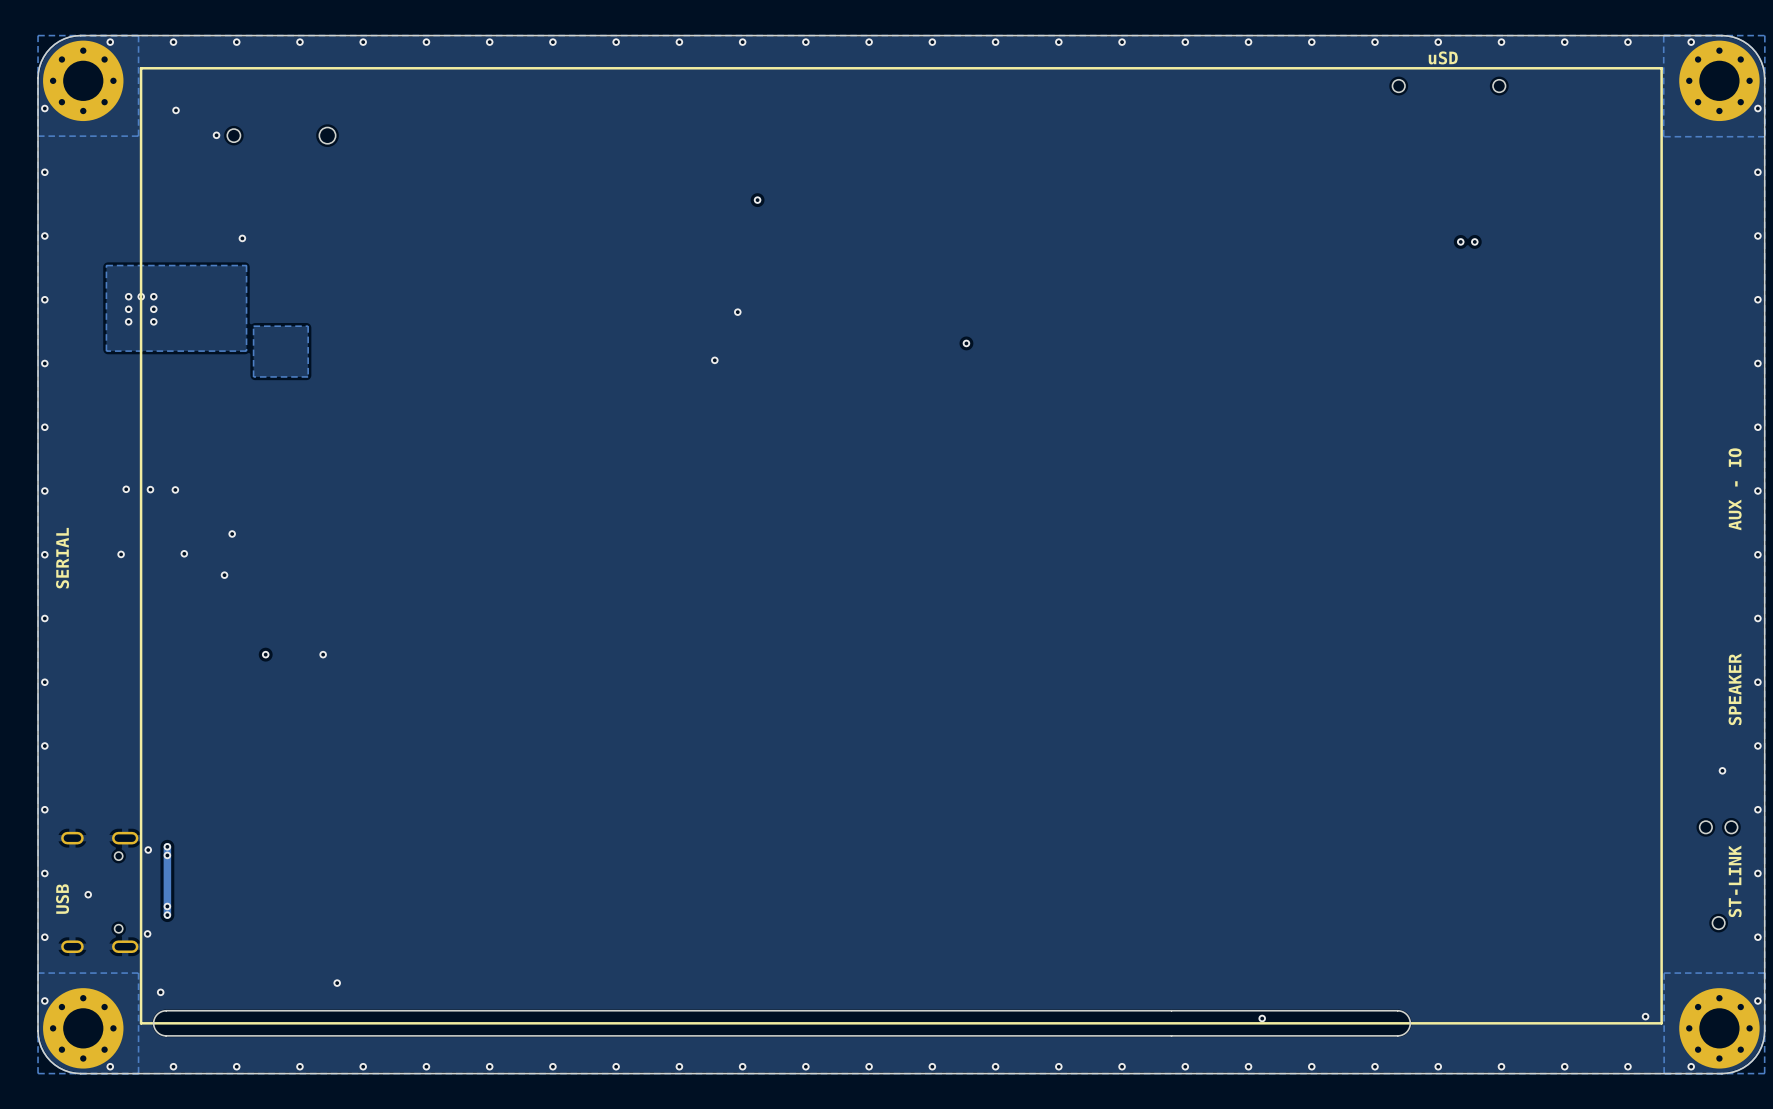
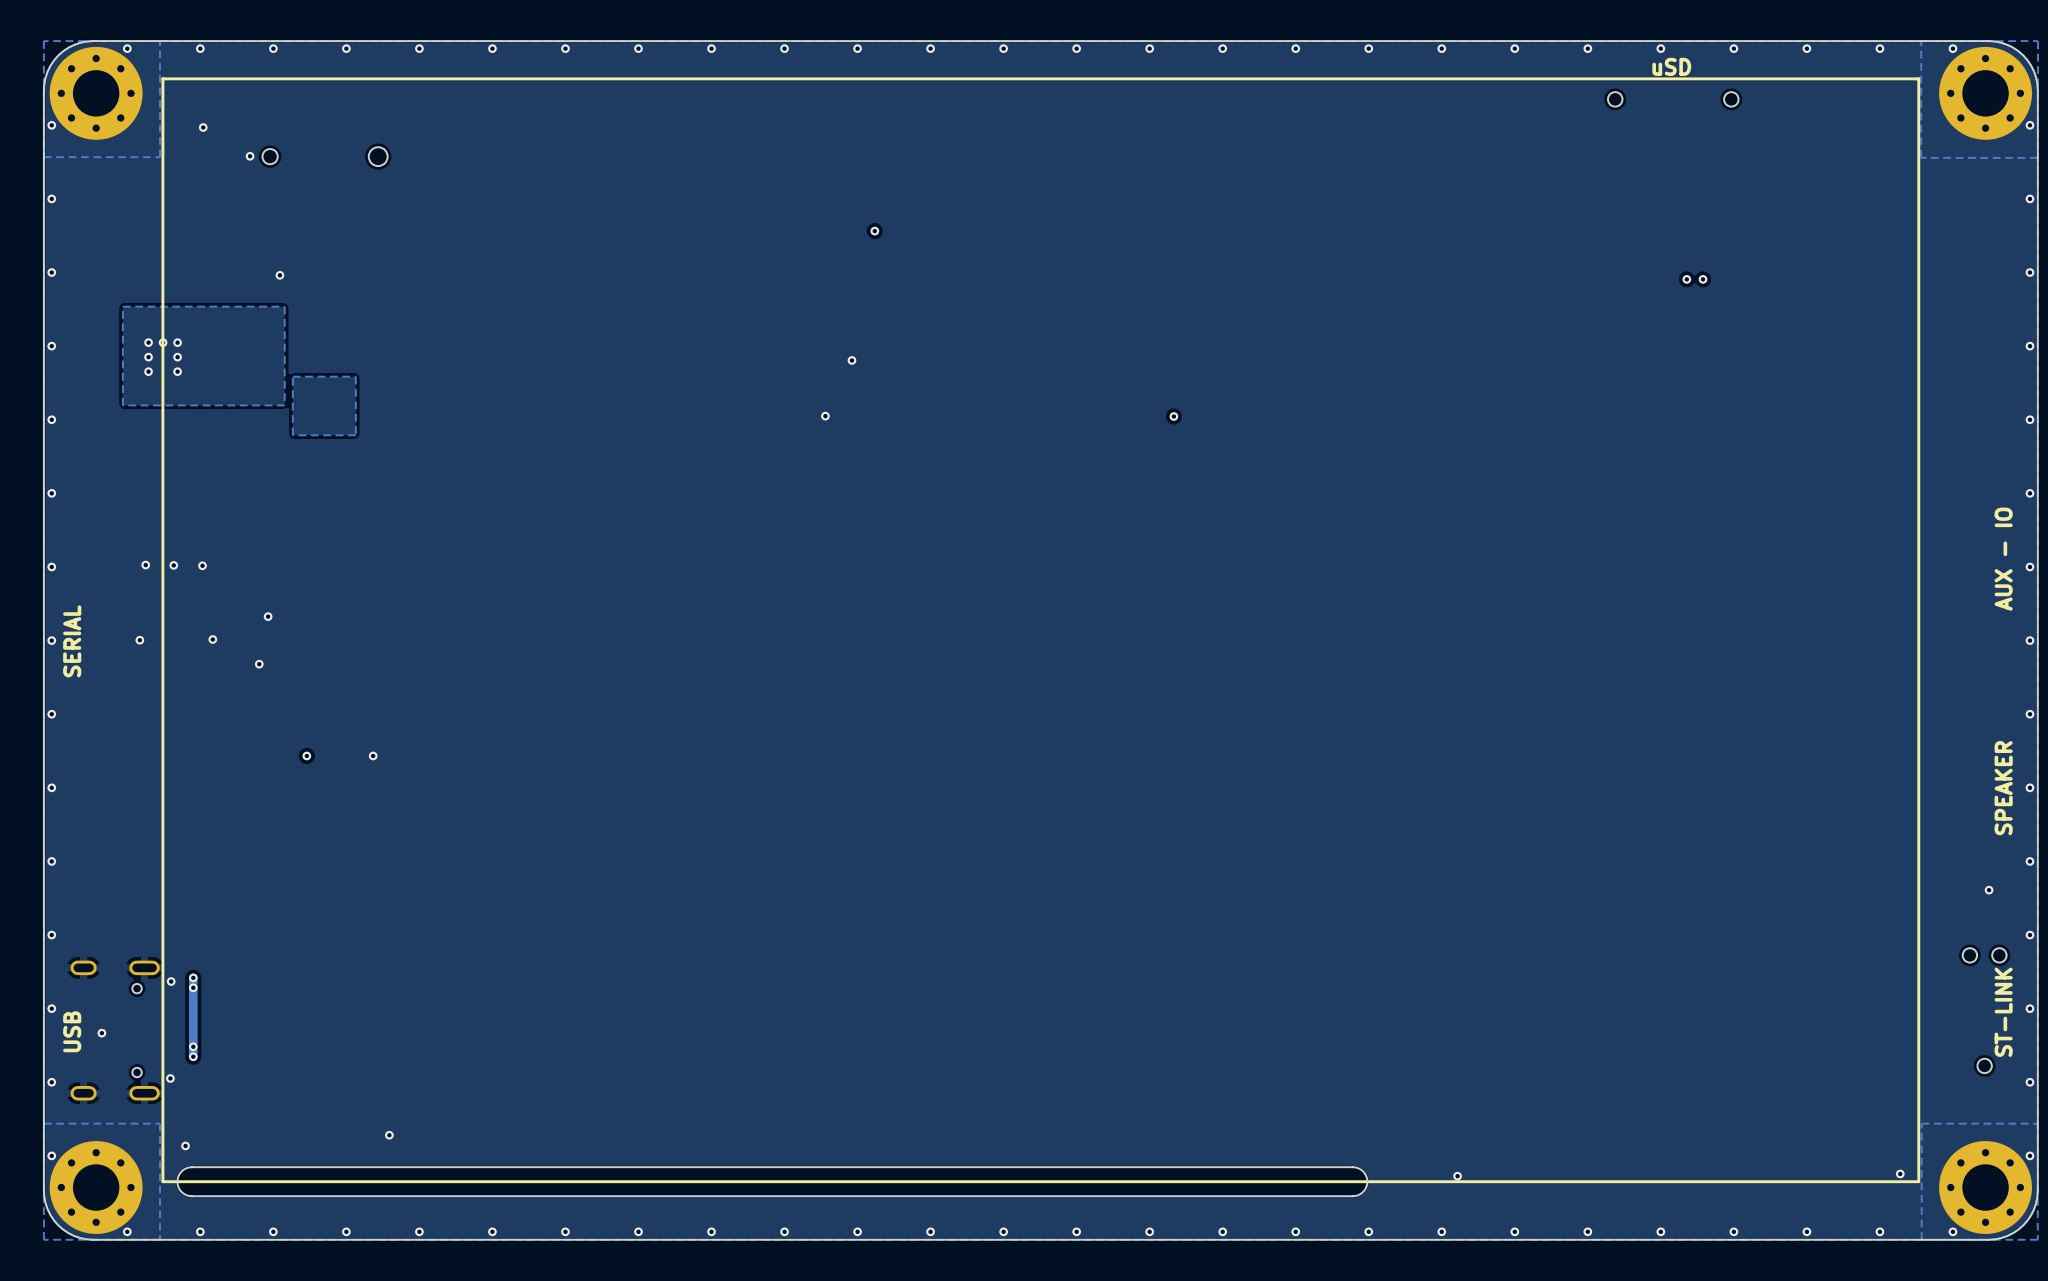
via position: (966, 343) -> (1173, 416)
board edge: (1171, 1010) (1397, 1010) (1406, 1013) (1410, 1023) (1406, 1032) (1397, 1035) (1171, 1035) -> (1352, 1167) (1362, 1170) (1367, 1181) (1362, 1192) (1352, 1196)

